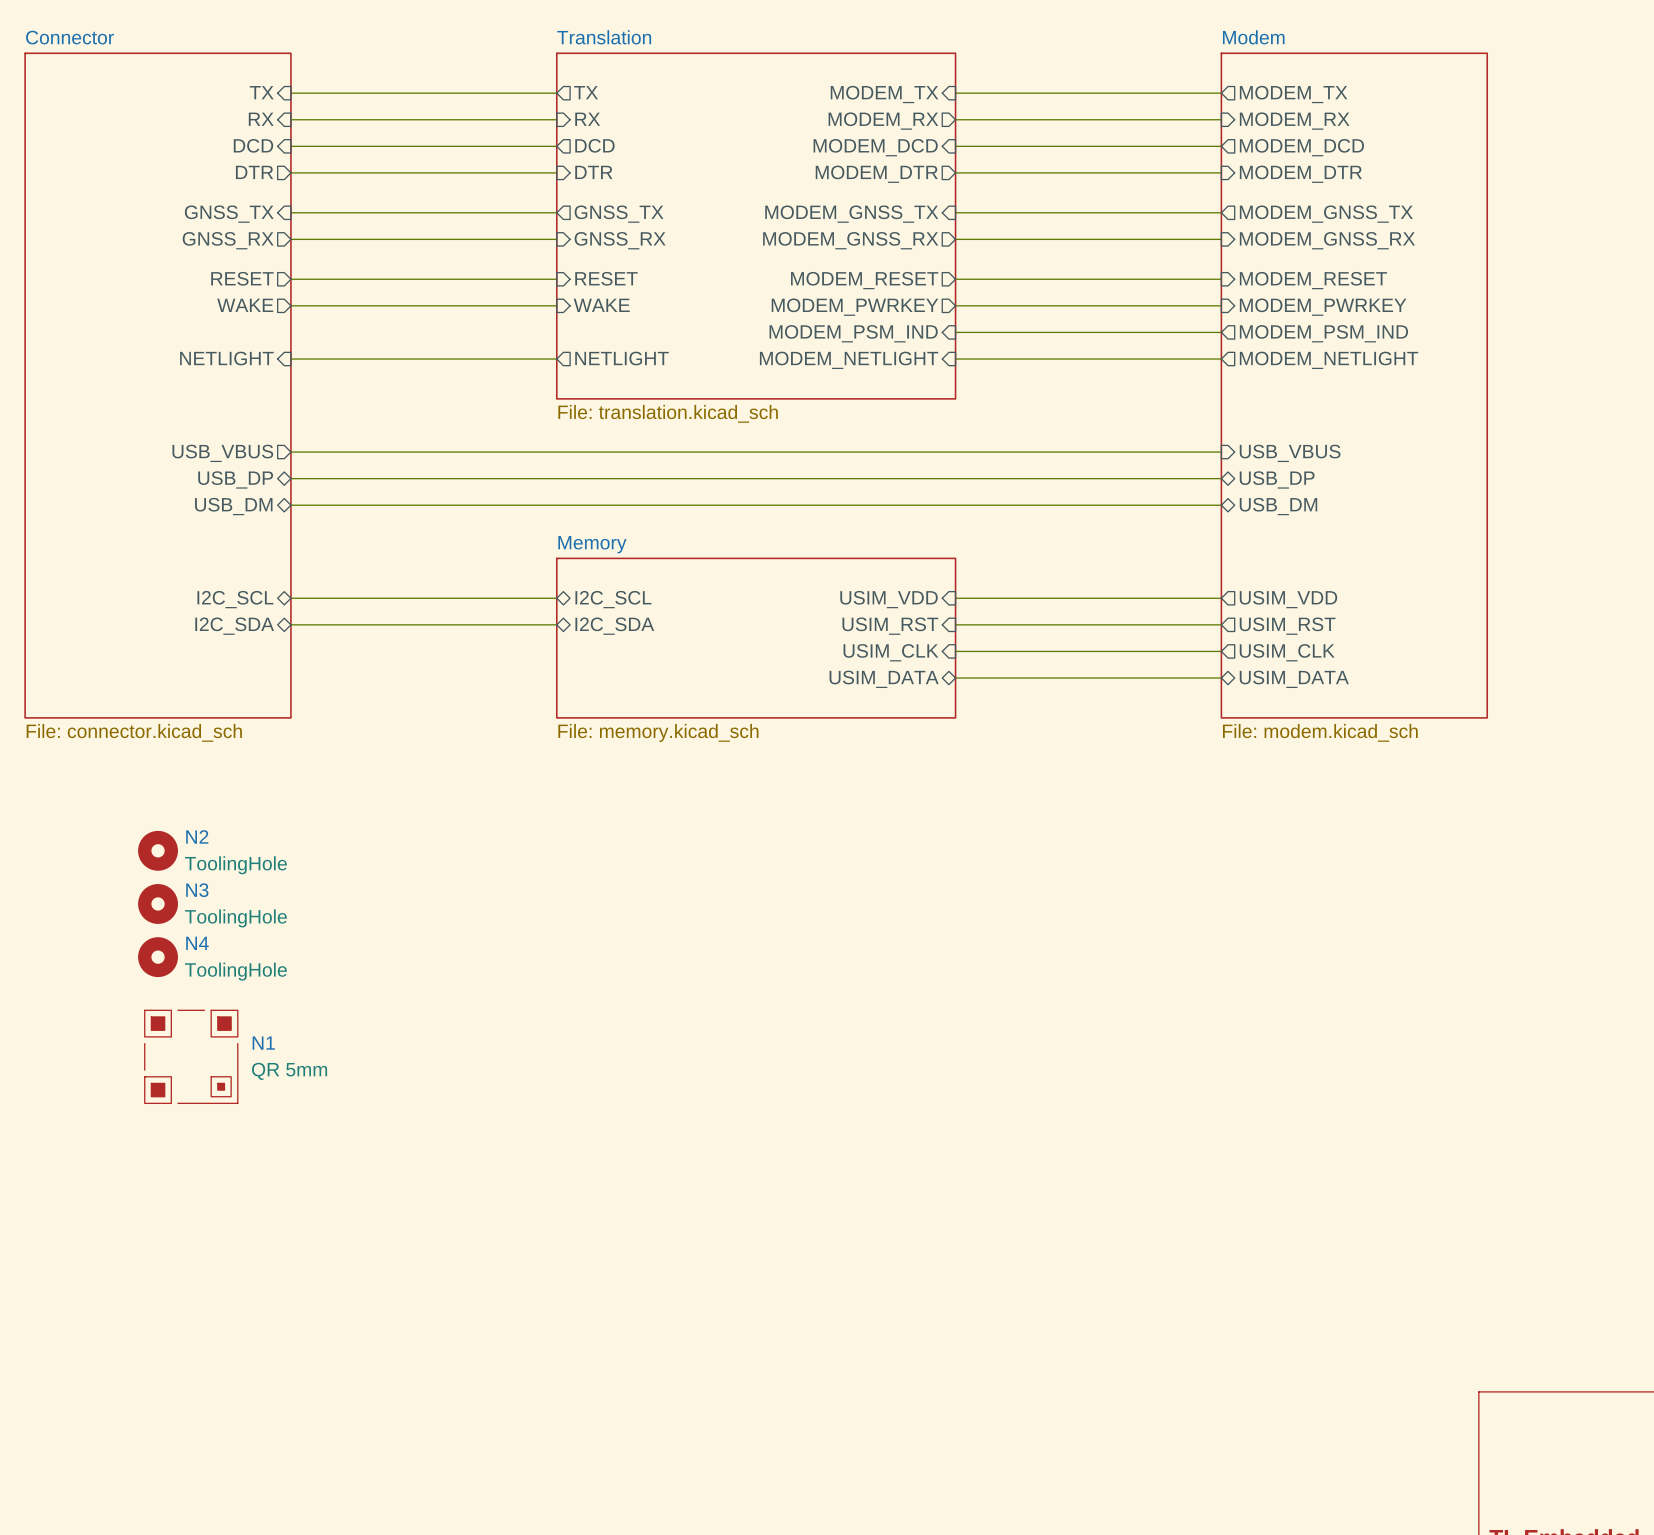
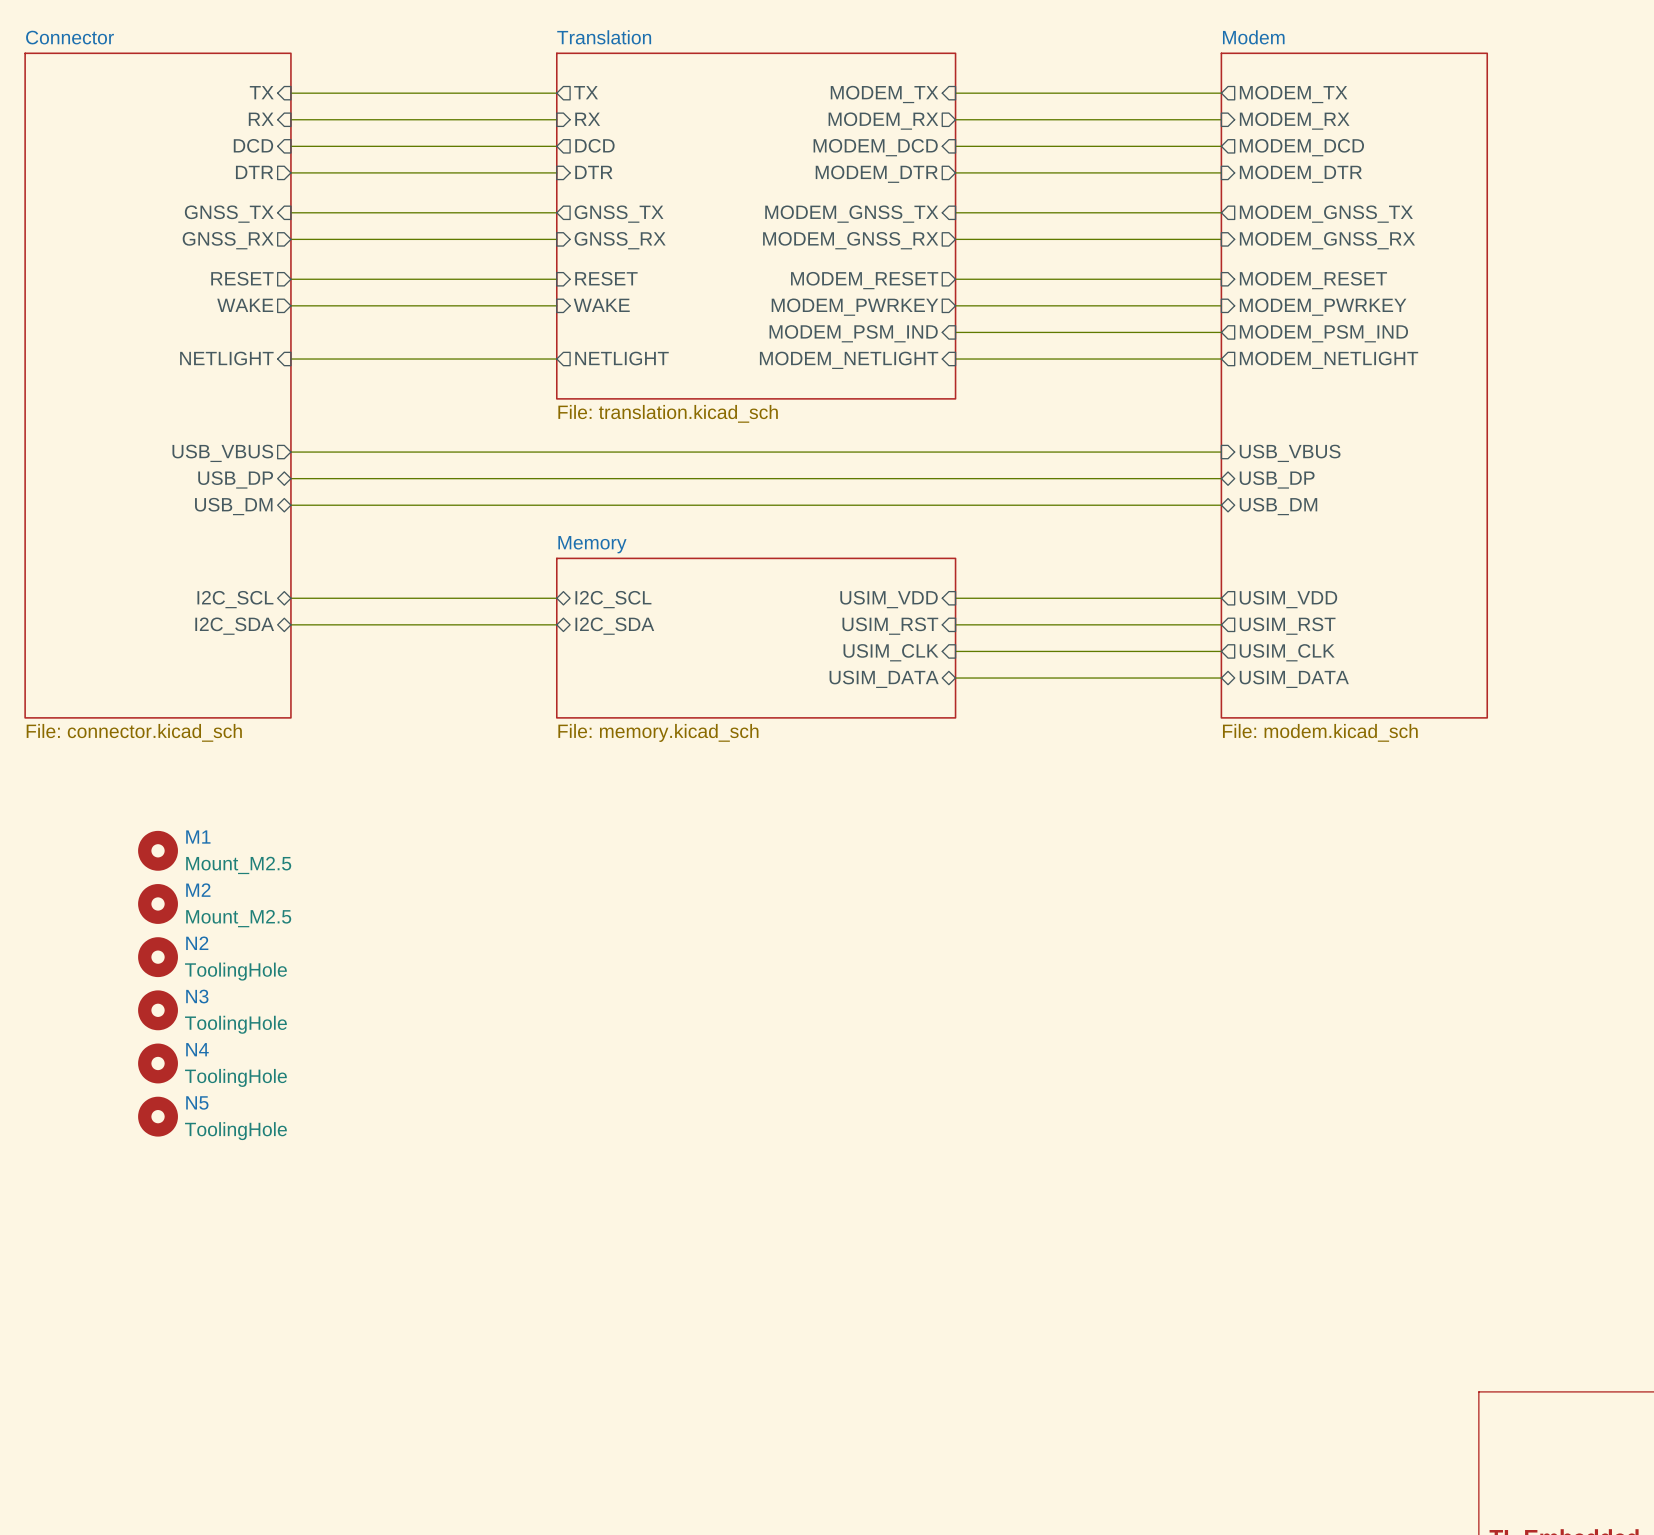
N2 name: N2 (197, 836) -> M1 (198, 837)
N2 value: ToolingHole (235, 865) -> Mount_M2.5 (238, 865)
N3 name: N3 (197, 890) -> M2 (198, 890)
N3 value: ToolingHole (235, 918) -> Mount_M2.5 (238, 918)
N4 name: N4 (197, 943) -> N2 (197, 943)
N3: none -> ToolingHole (158, 1010)
N1: QR 5mm (191, 1056) -> none
N4: none -> ToolingHole (158, 1063)
N5: none -> ToolingHole (158, 1116)

